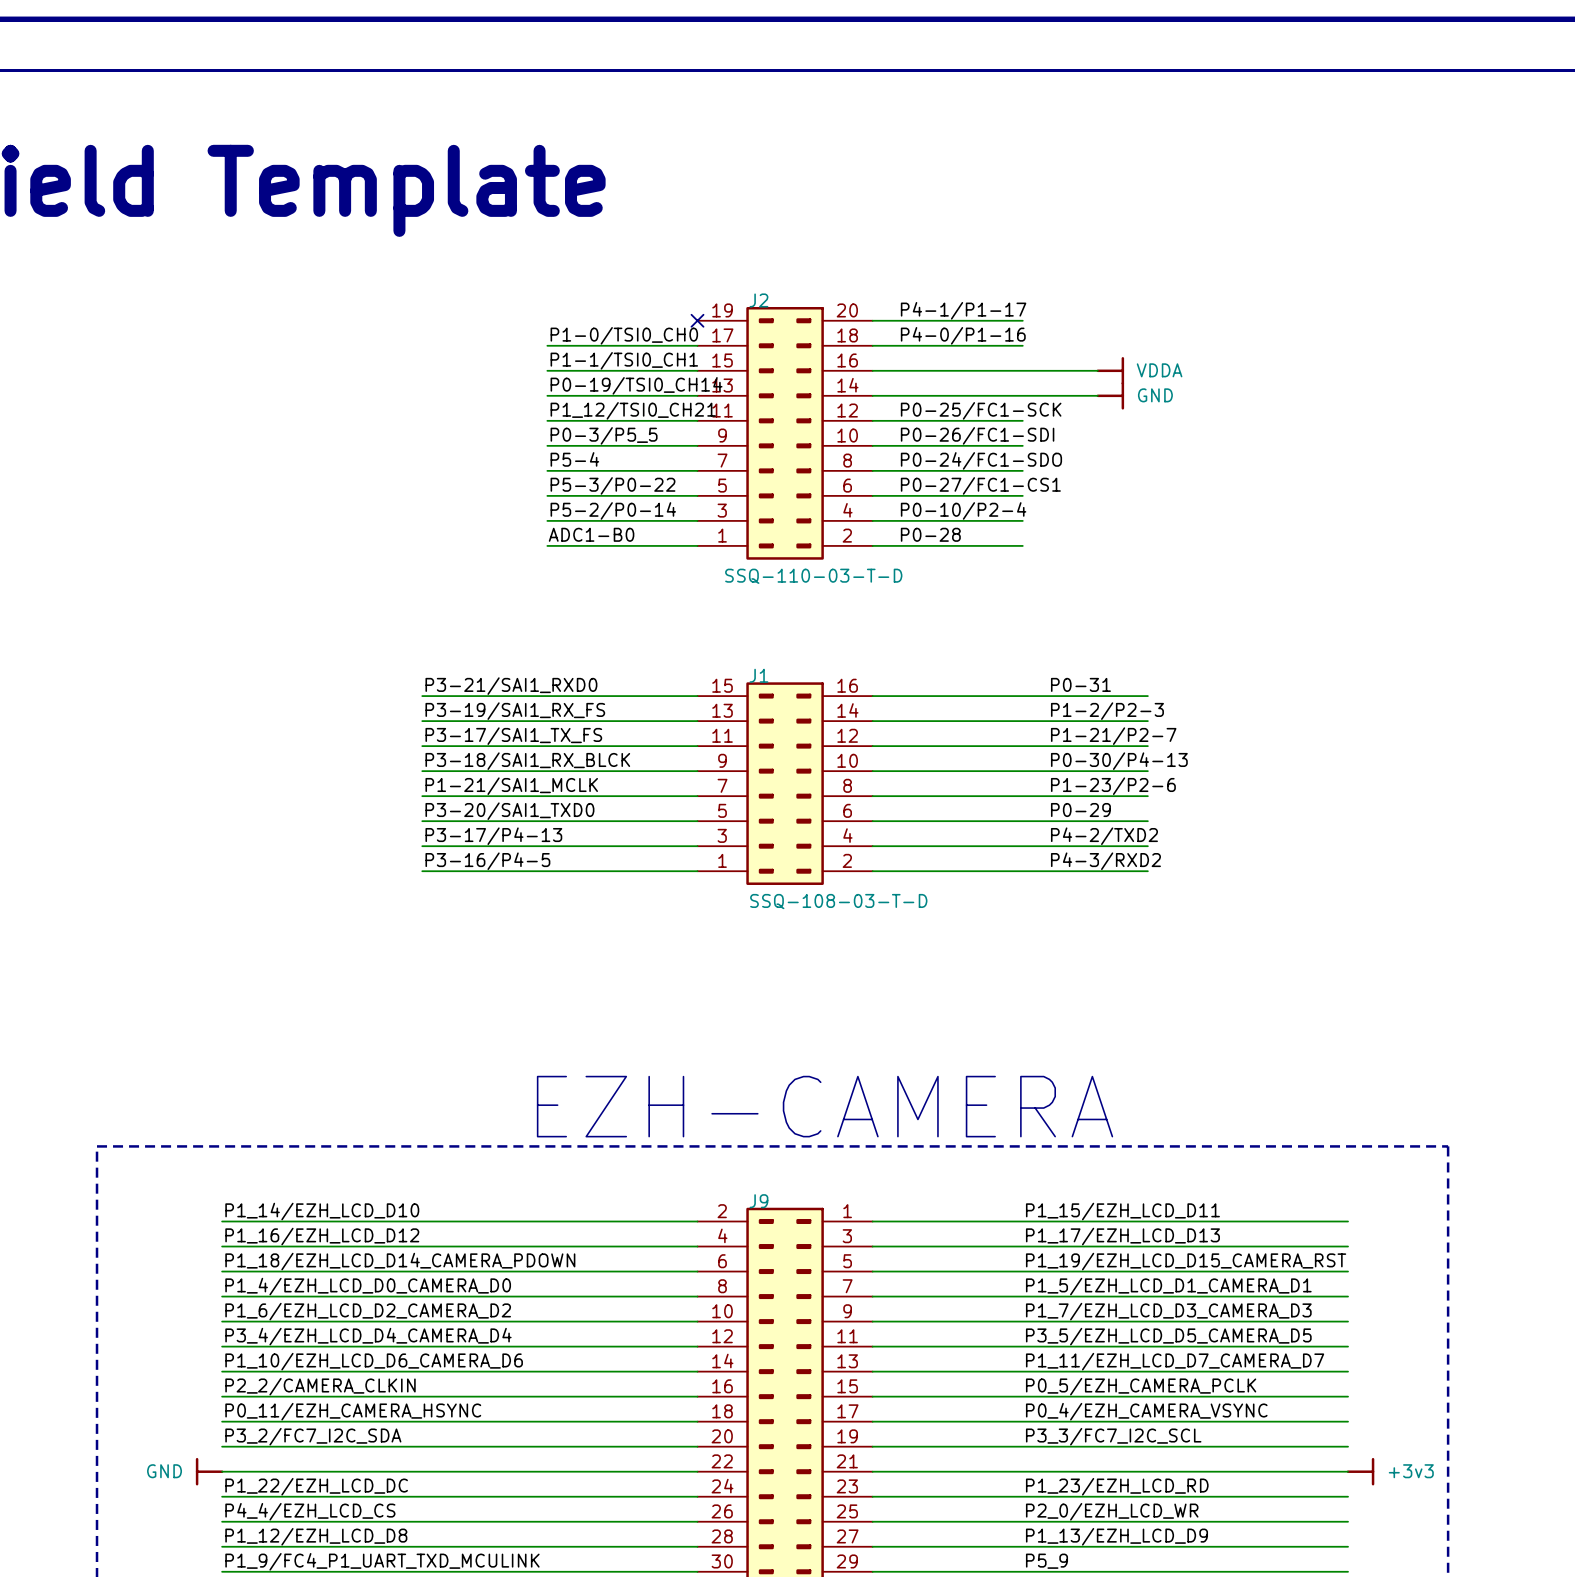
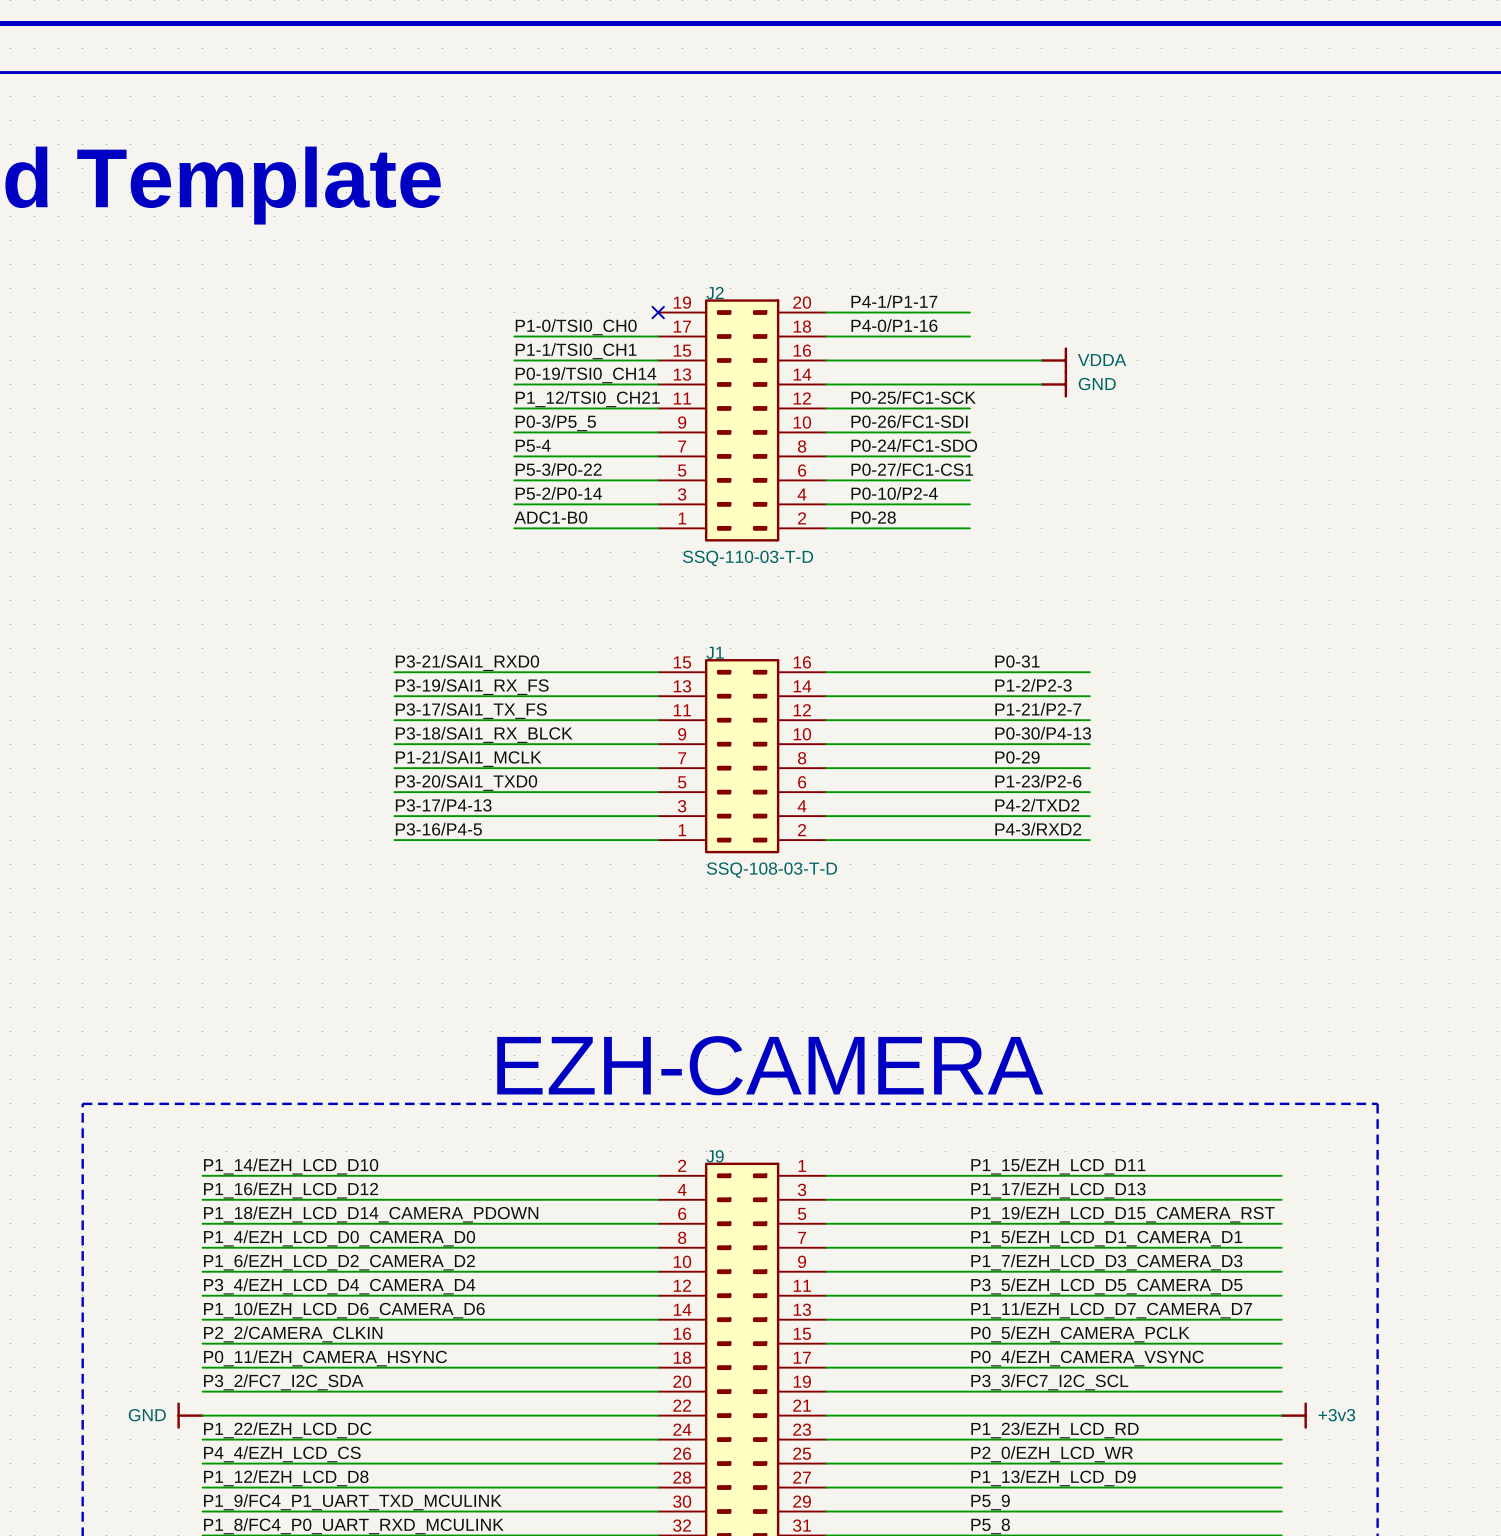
label: P1-23/P2-6 (1113, 786) -> P0-29 (1017, 757)
label: P0-29 (1080, 810) -> P1-23/P2-6 (1038, 781)

